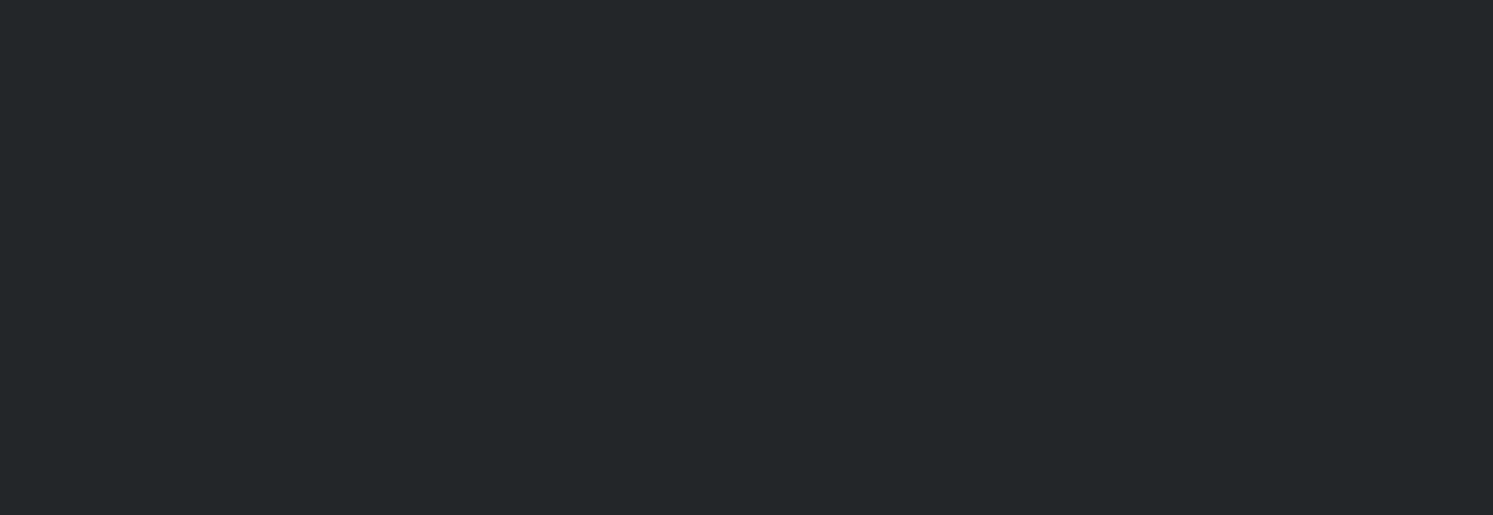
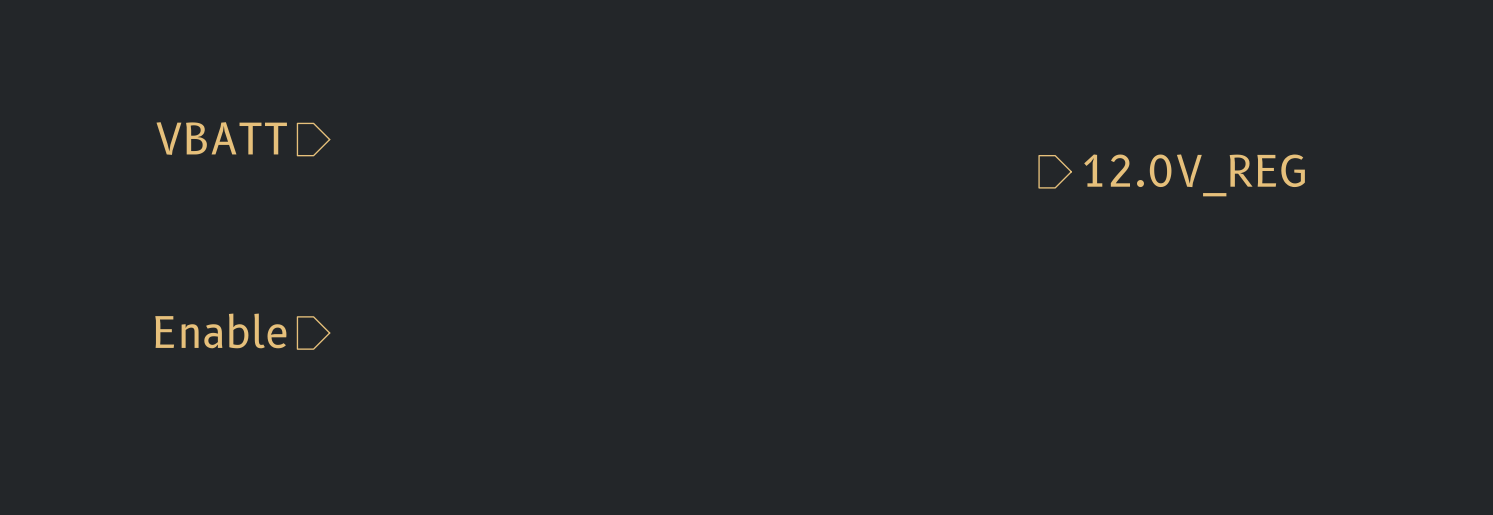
hierarchical label: none -> VBATT (221, 138)
hierarchical label: none -> 12.0V_REG (1194, 175)
hierarchical label: none -> Enable (220, 330)

